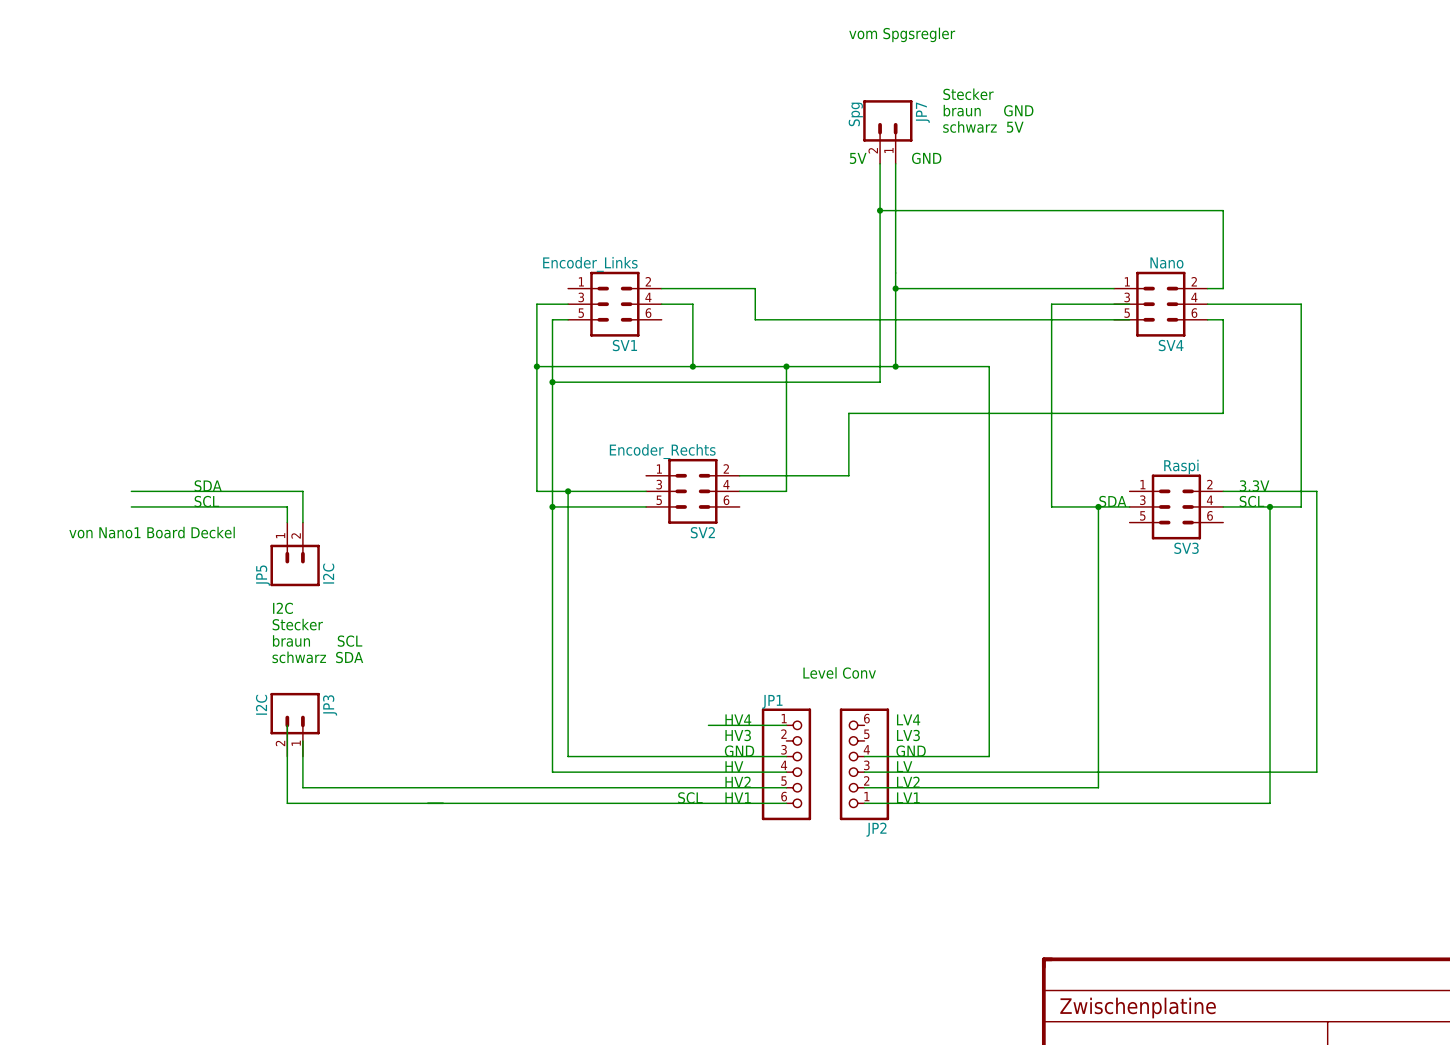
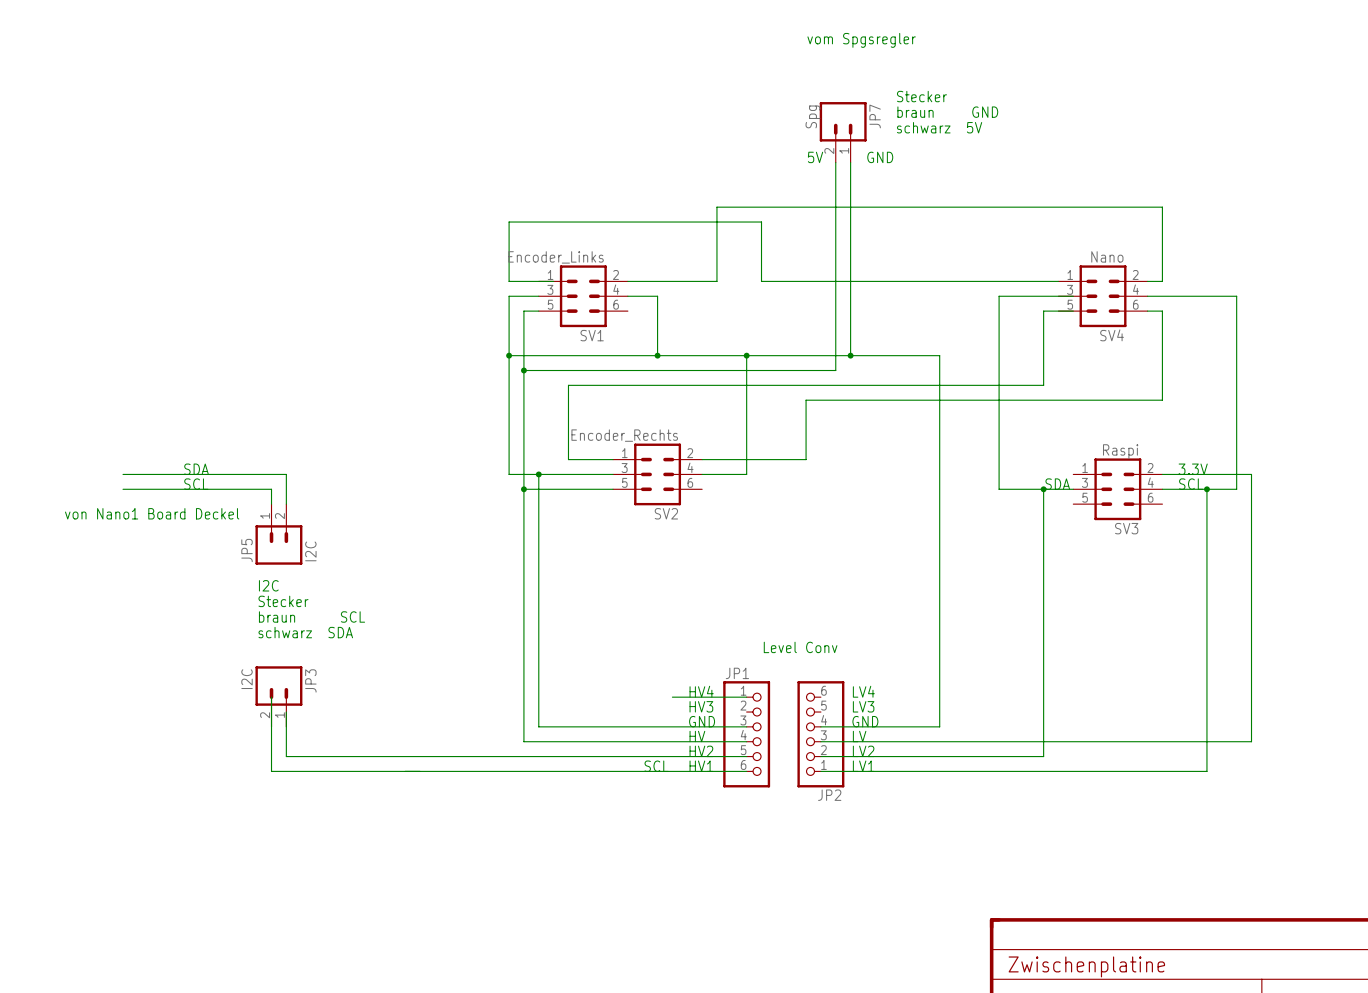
wire: none -> (835, 207) (716, 207) (716, 281)
junction: (880, 210) -> none
wire: none -> (553, 281) (509, 281) (509, 222) (761, 222) (761, 281) (850, 281)
wire: (755, 288) (755, 319) (1098, 319) -> (613, 459) (568, 459) (568, 385) (1043, 385) (1043, 311)
junction: (895, 288) -> none

